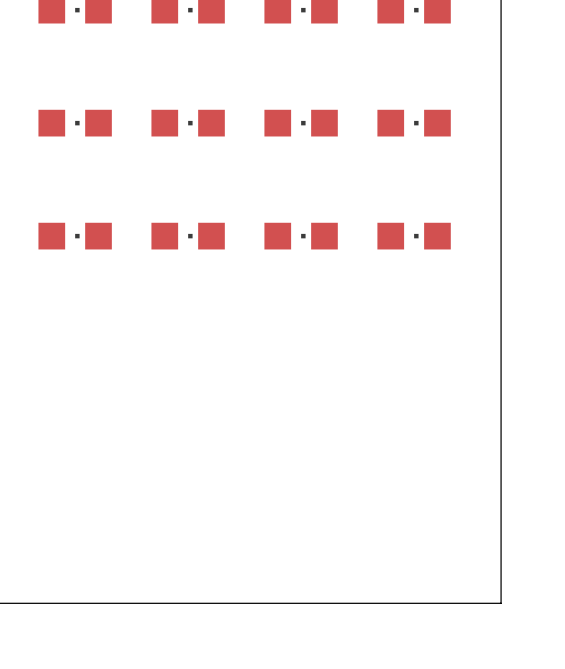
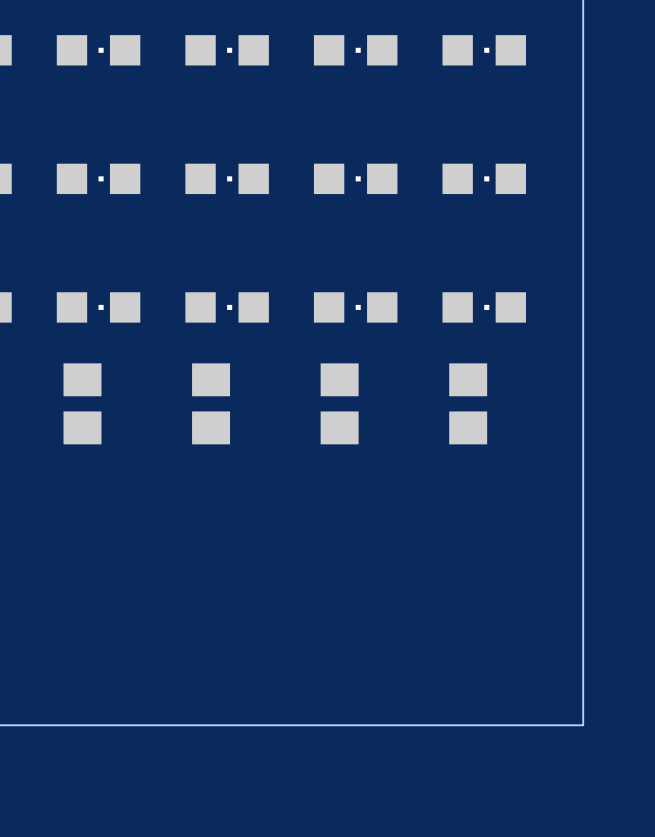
part: none -> (82, 403)
part: none -> (211, 403)
part: none -> (339, 403)
part: none -> (468, 403)

